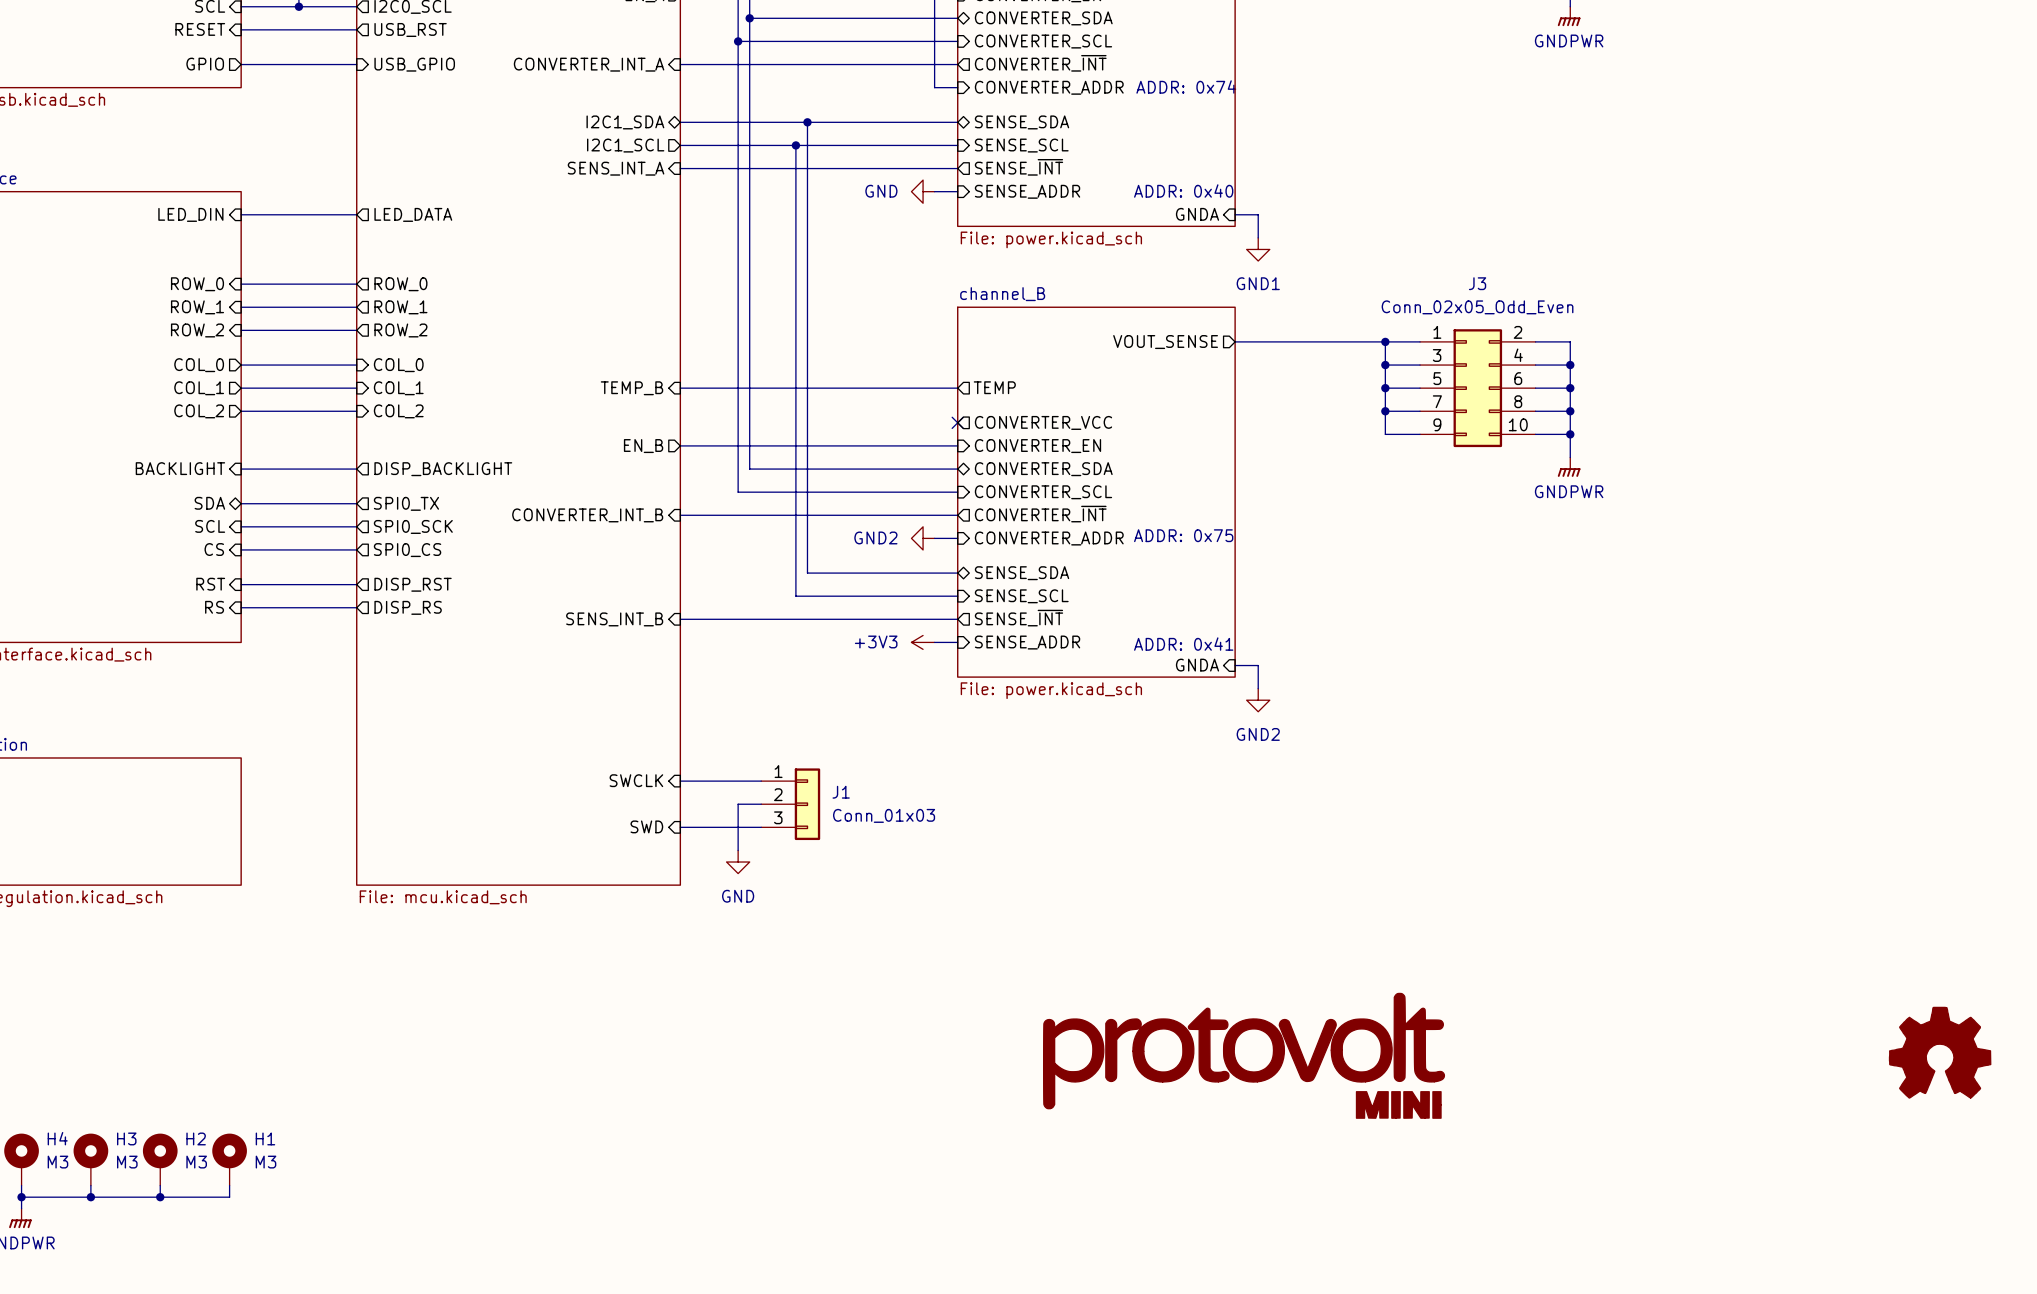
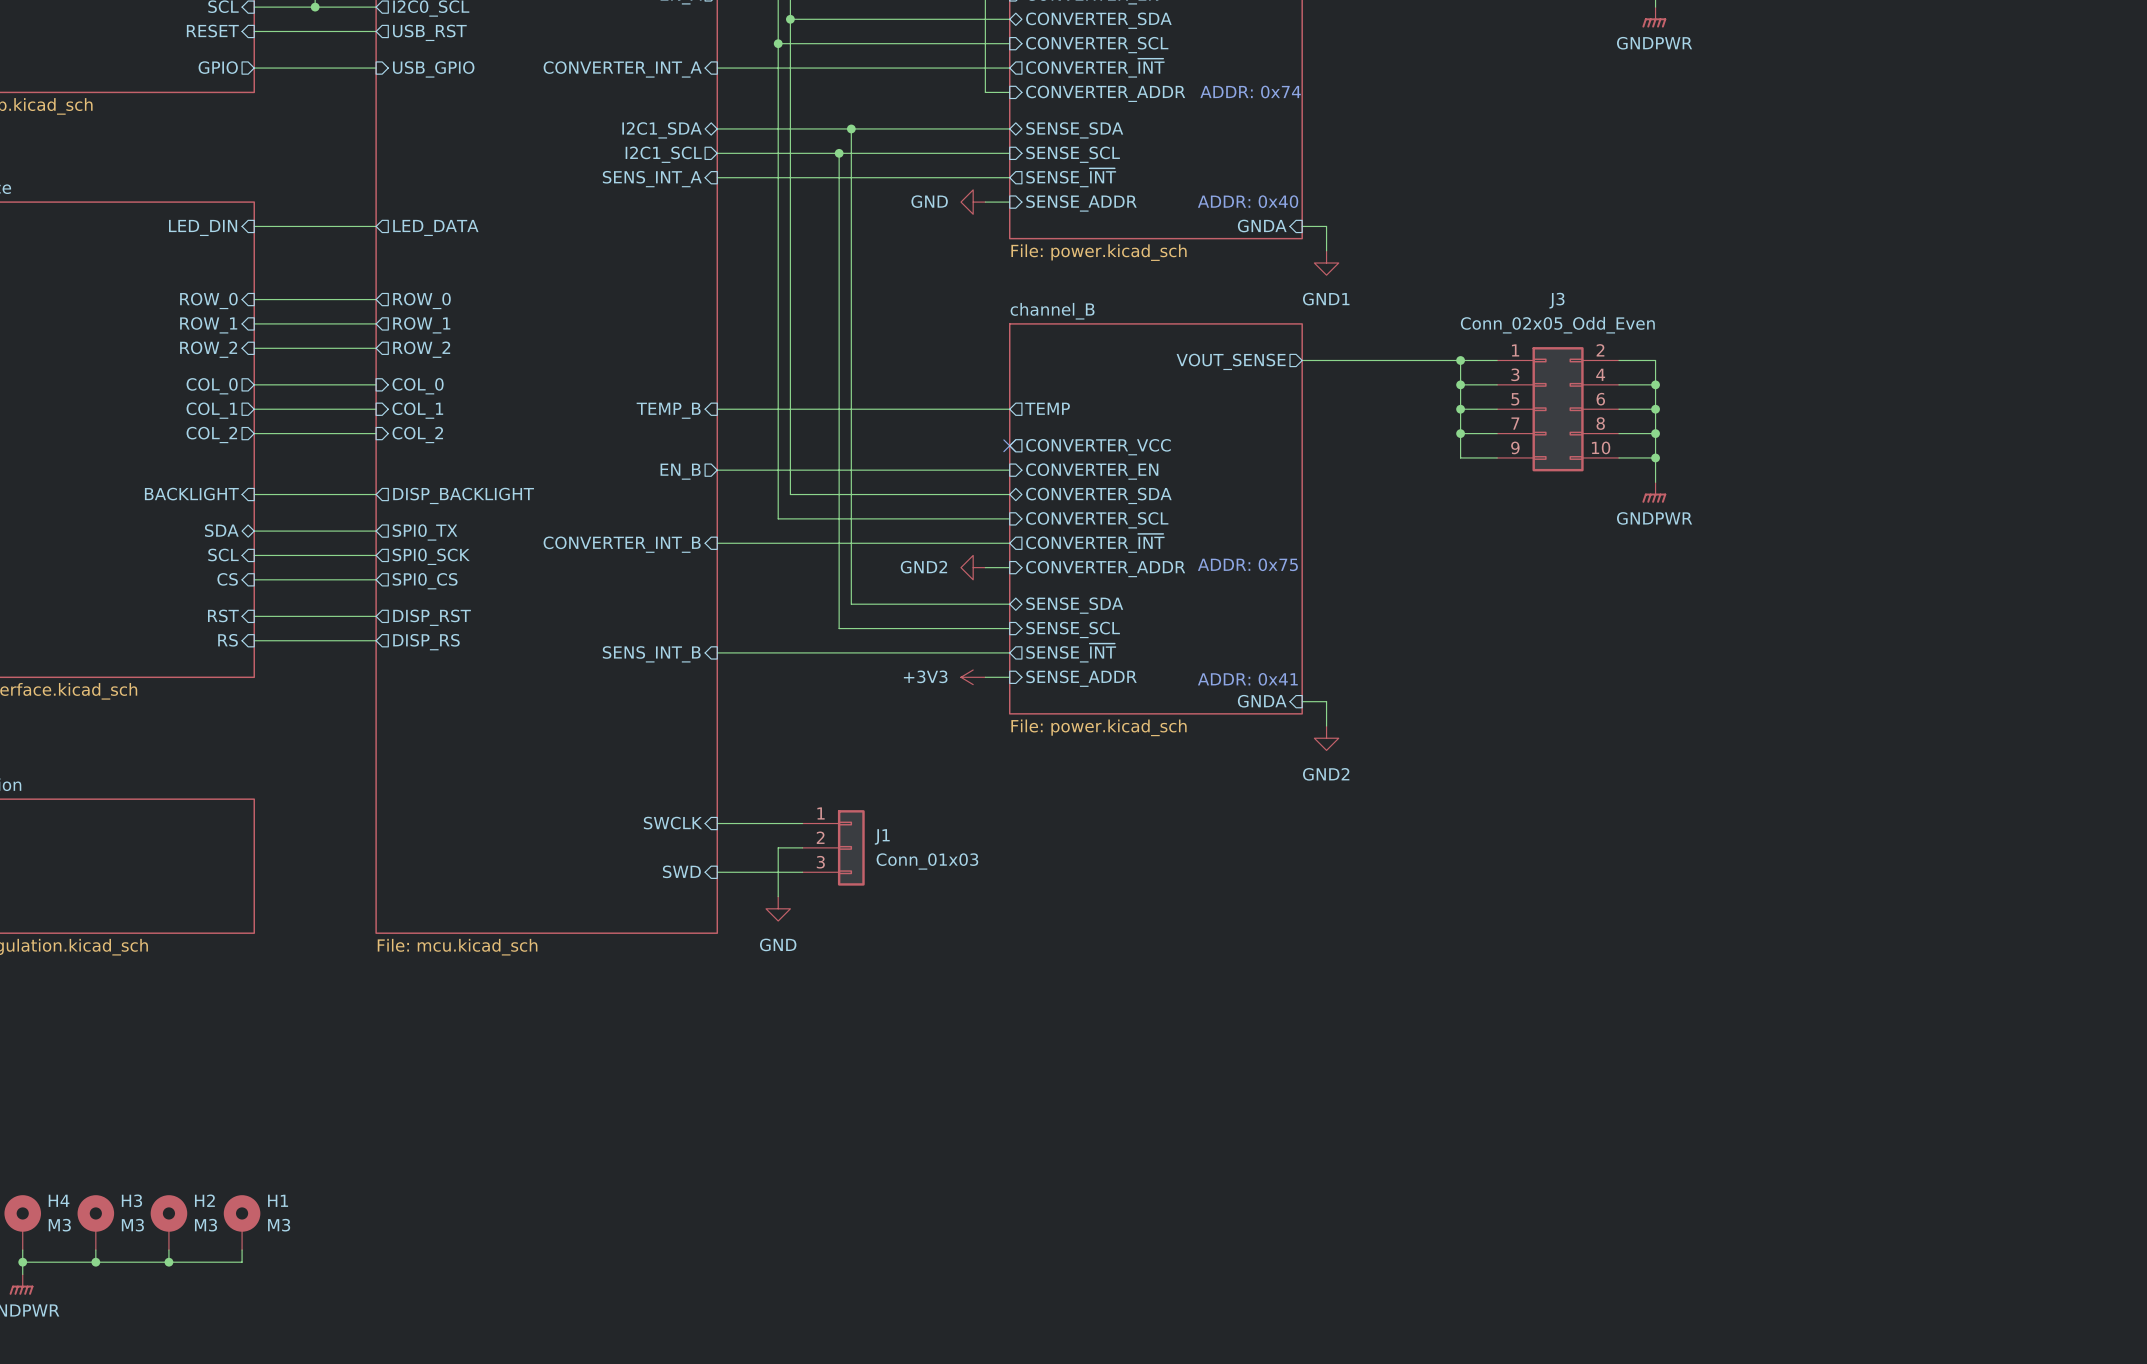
power symbol: (1940, 1052) -> none
power symbol: (1244, 1055) -> none

